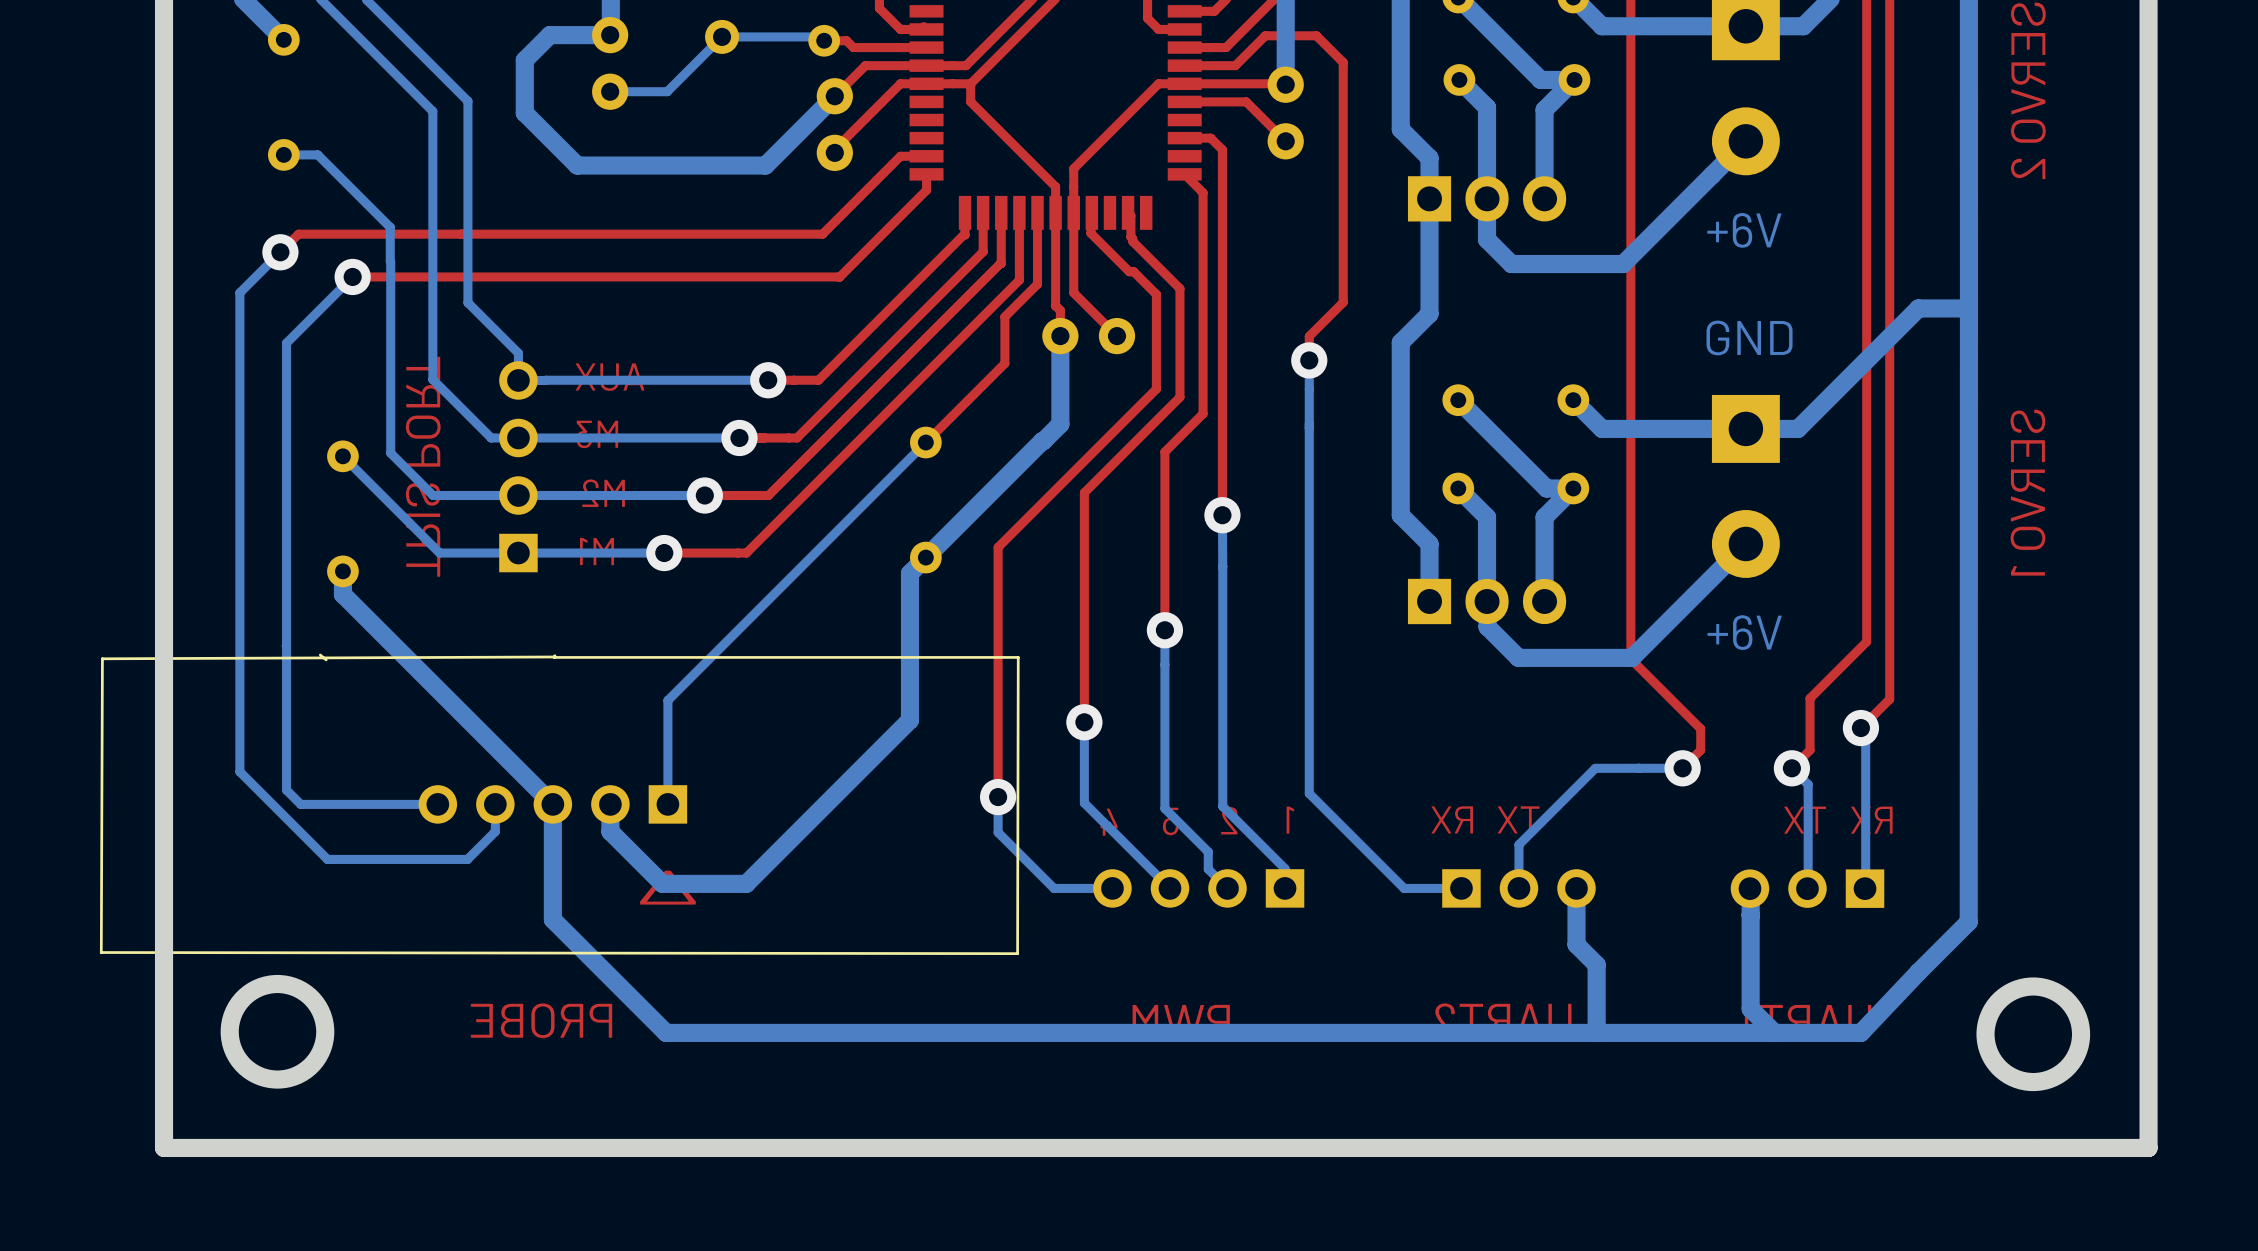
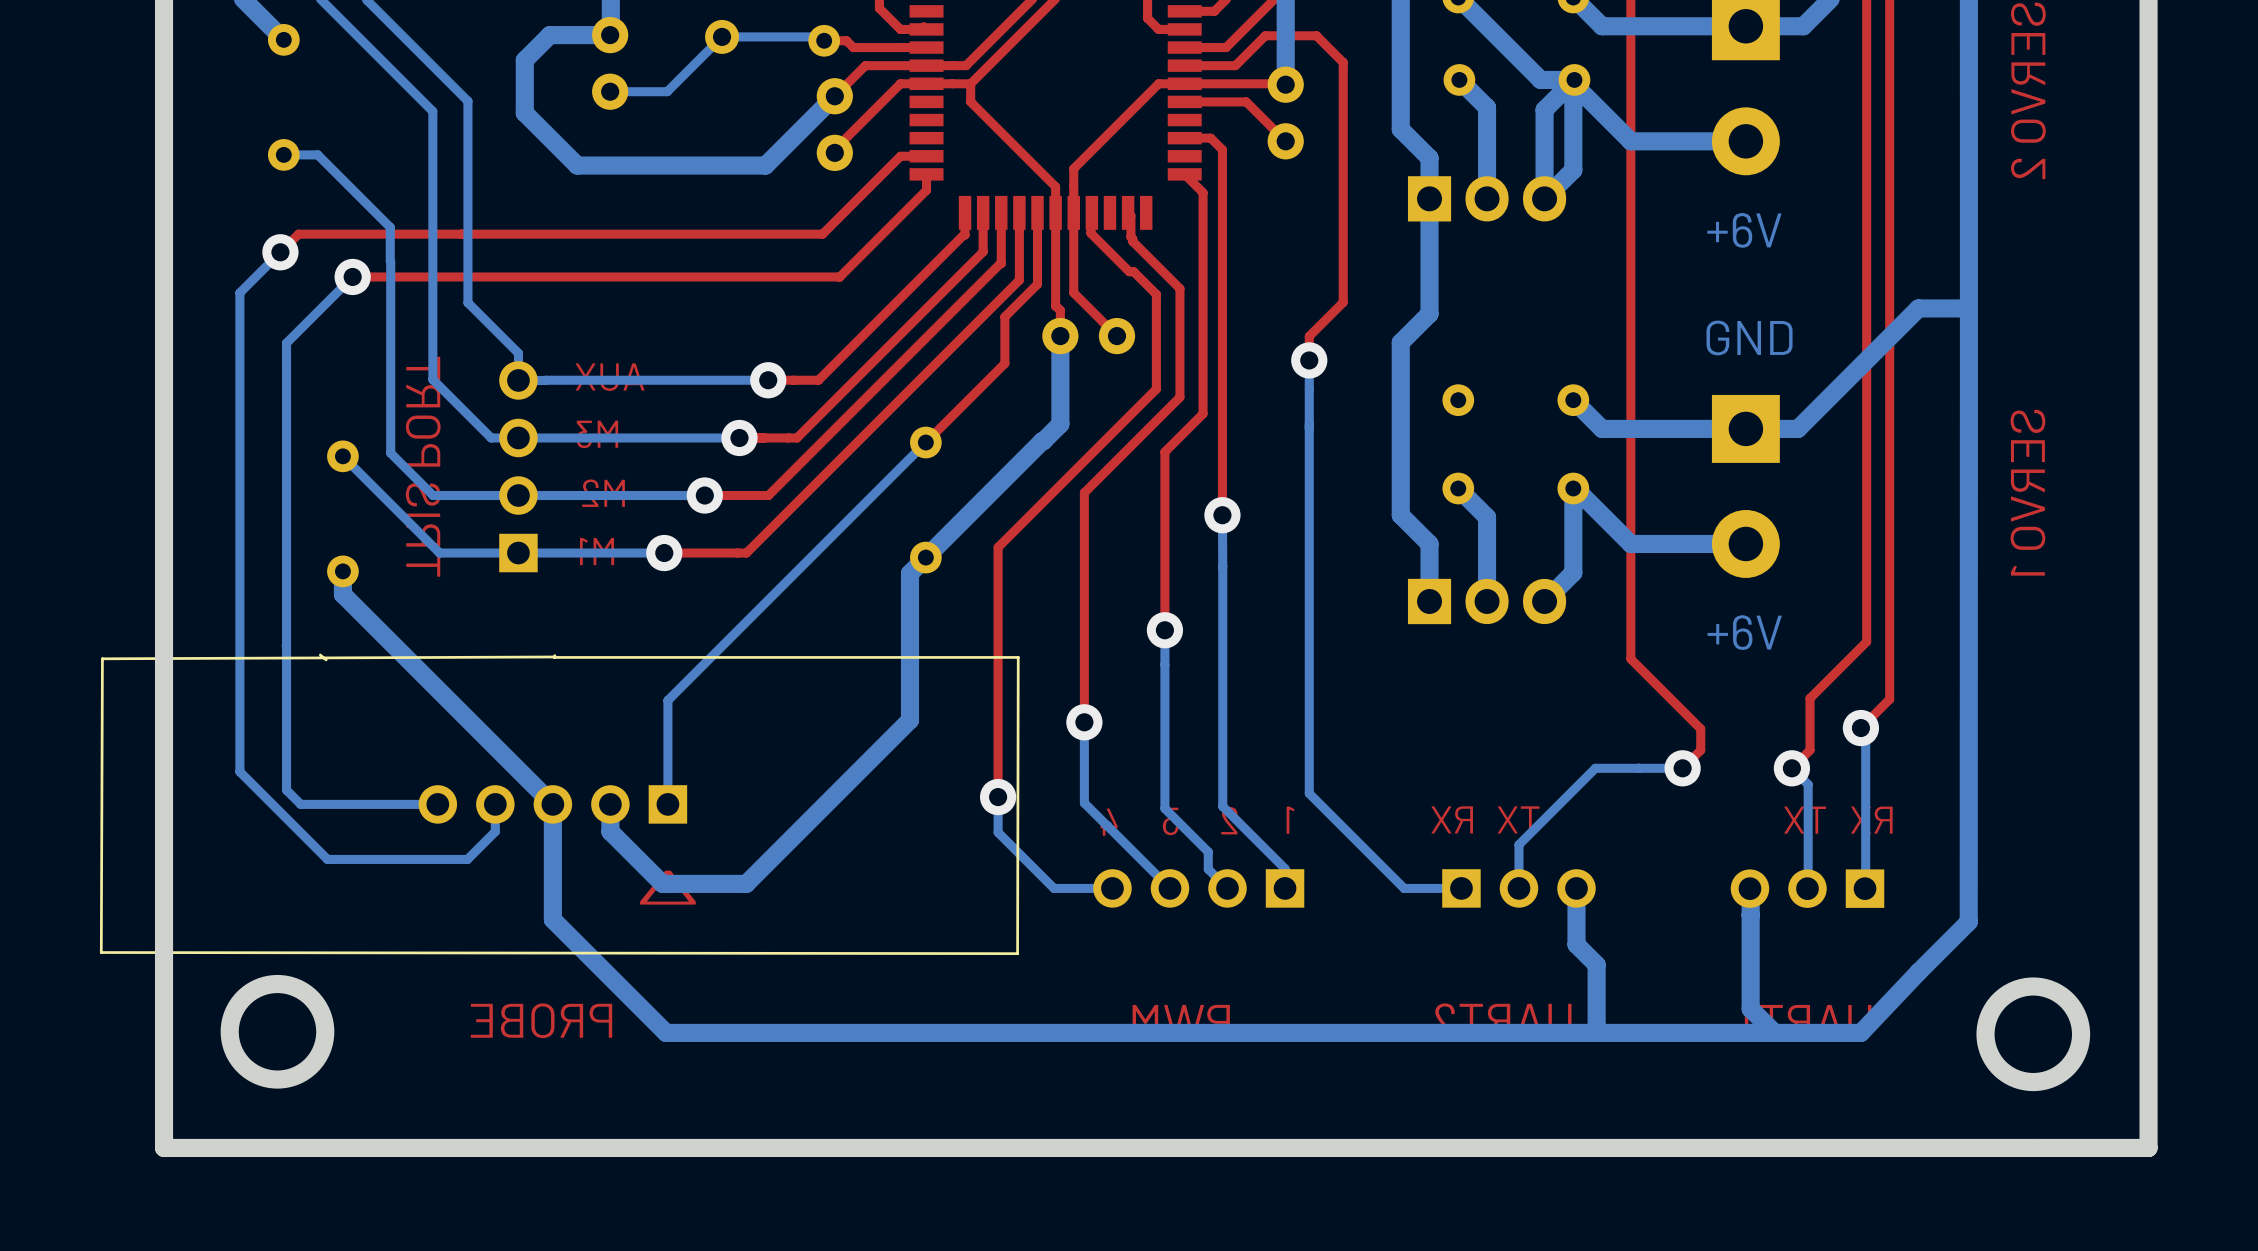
bottom track: (1745, 141) (1623, 264) (1511, 264) (1487, 239) (1487, 198) -> (1745, 141) (1630, 141) (1573, 83) (1573, 170) (1544, 198)
bottom track: (1458, 400) (1546, 488) (1573, 488) (1544, 517) (1544, 601) -> none
bottom track: (1745, 543) (1631, 657) (1518, 657) (1487, 626) (1487, 601) -> (1745, 543) (1630, 543) (1573, 486) (1573, 572) (1544, 601)

